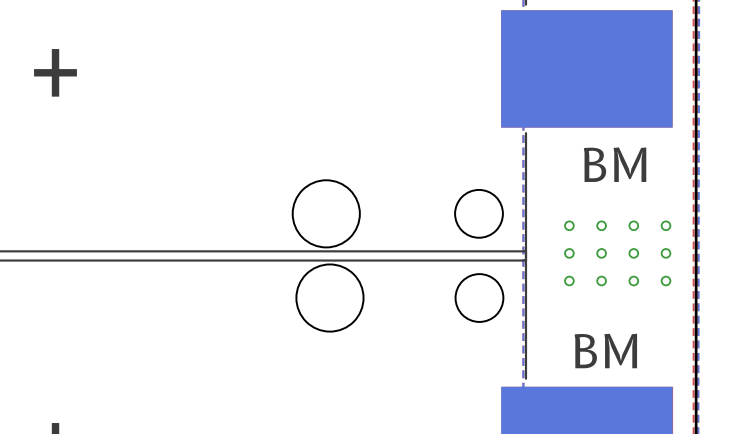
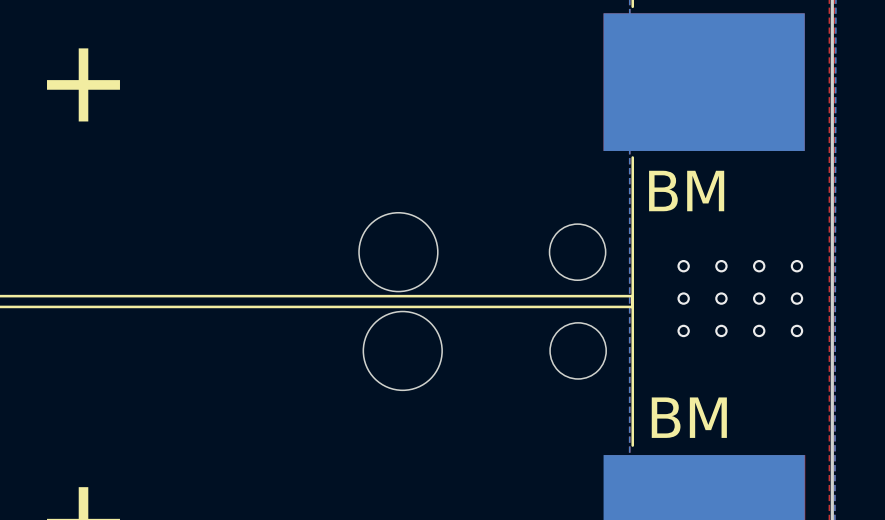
text position: BM (615, 164) -> BM (686, 191)
text position: BM (605, 351) -> BM (689, 417)

